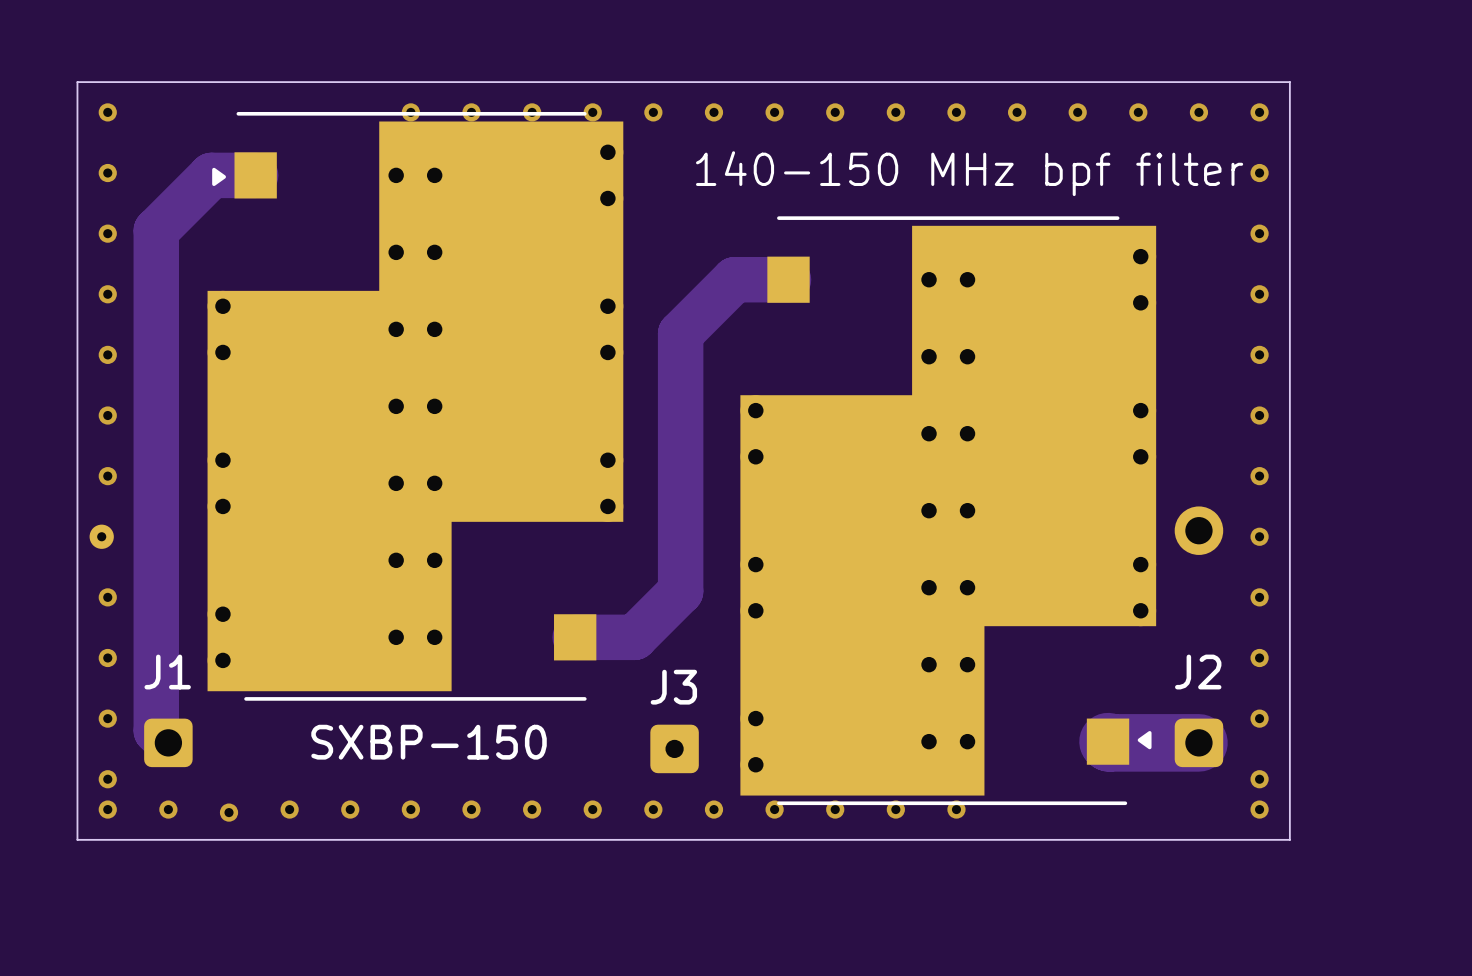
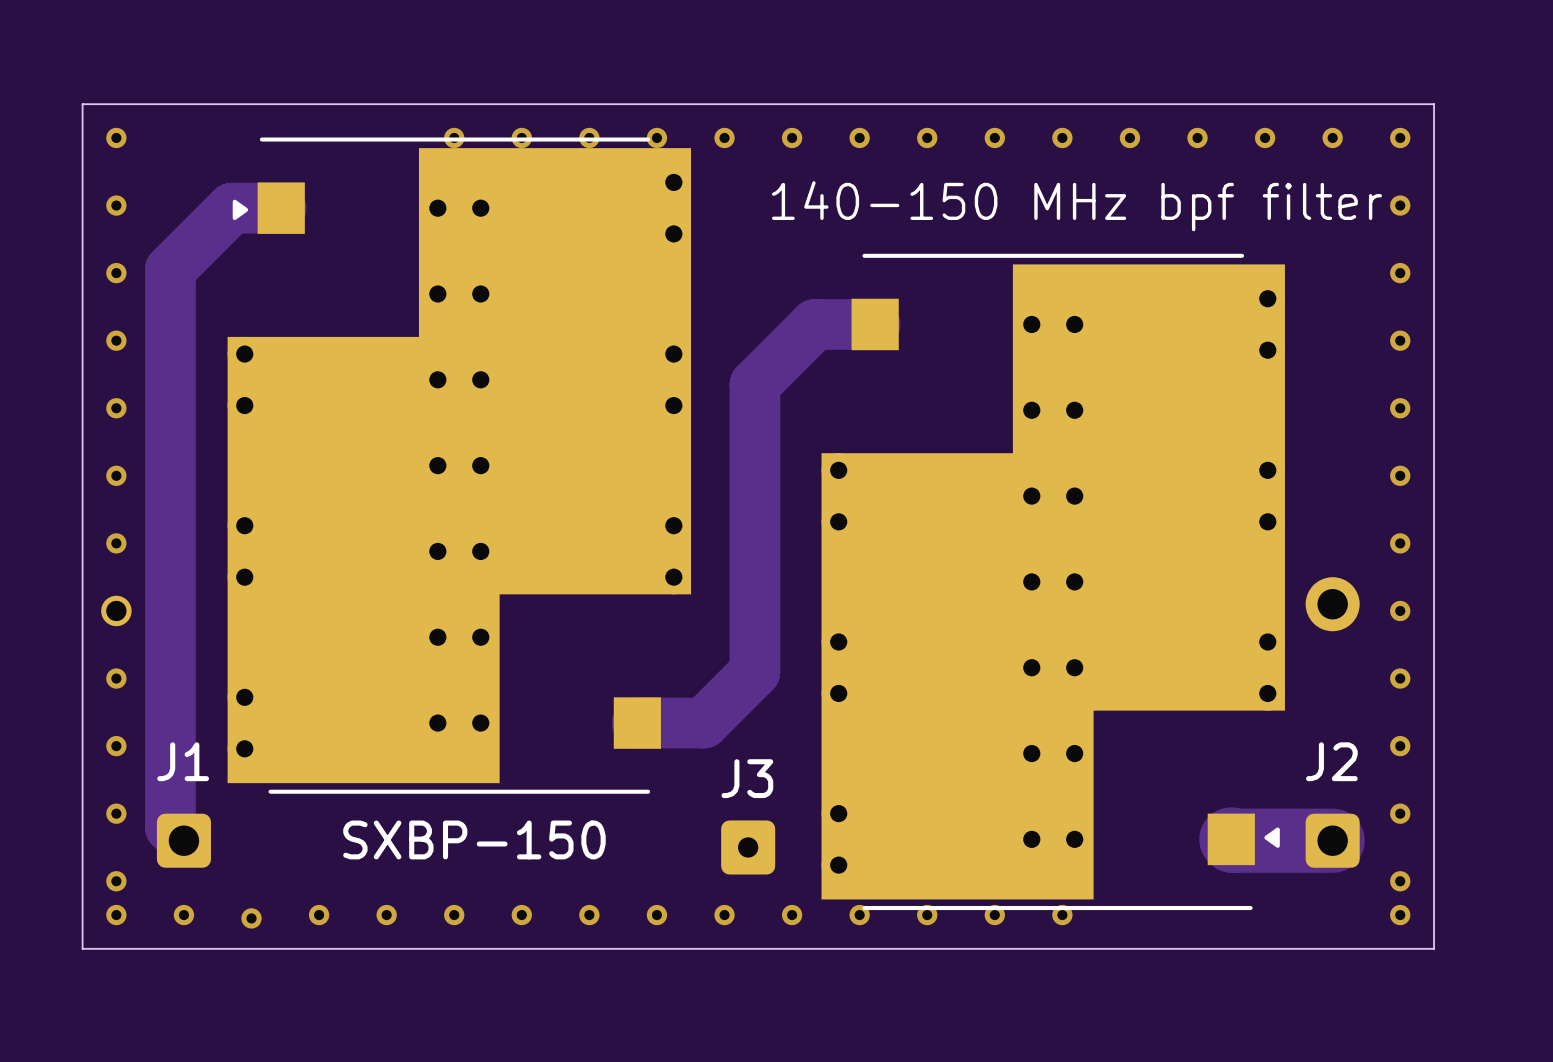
J1 footprint: [89, 524, 193, 768] -> [101, 595, 211, 868]

